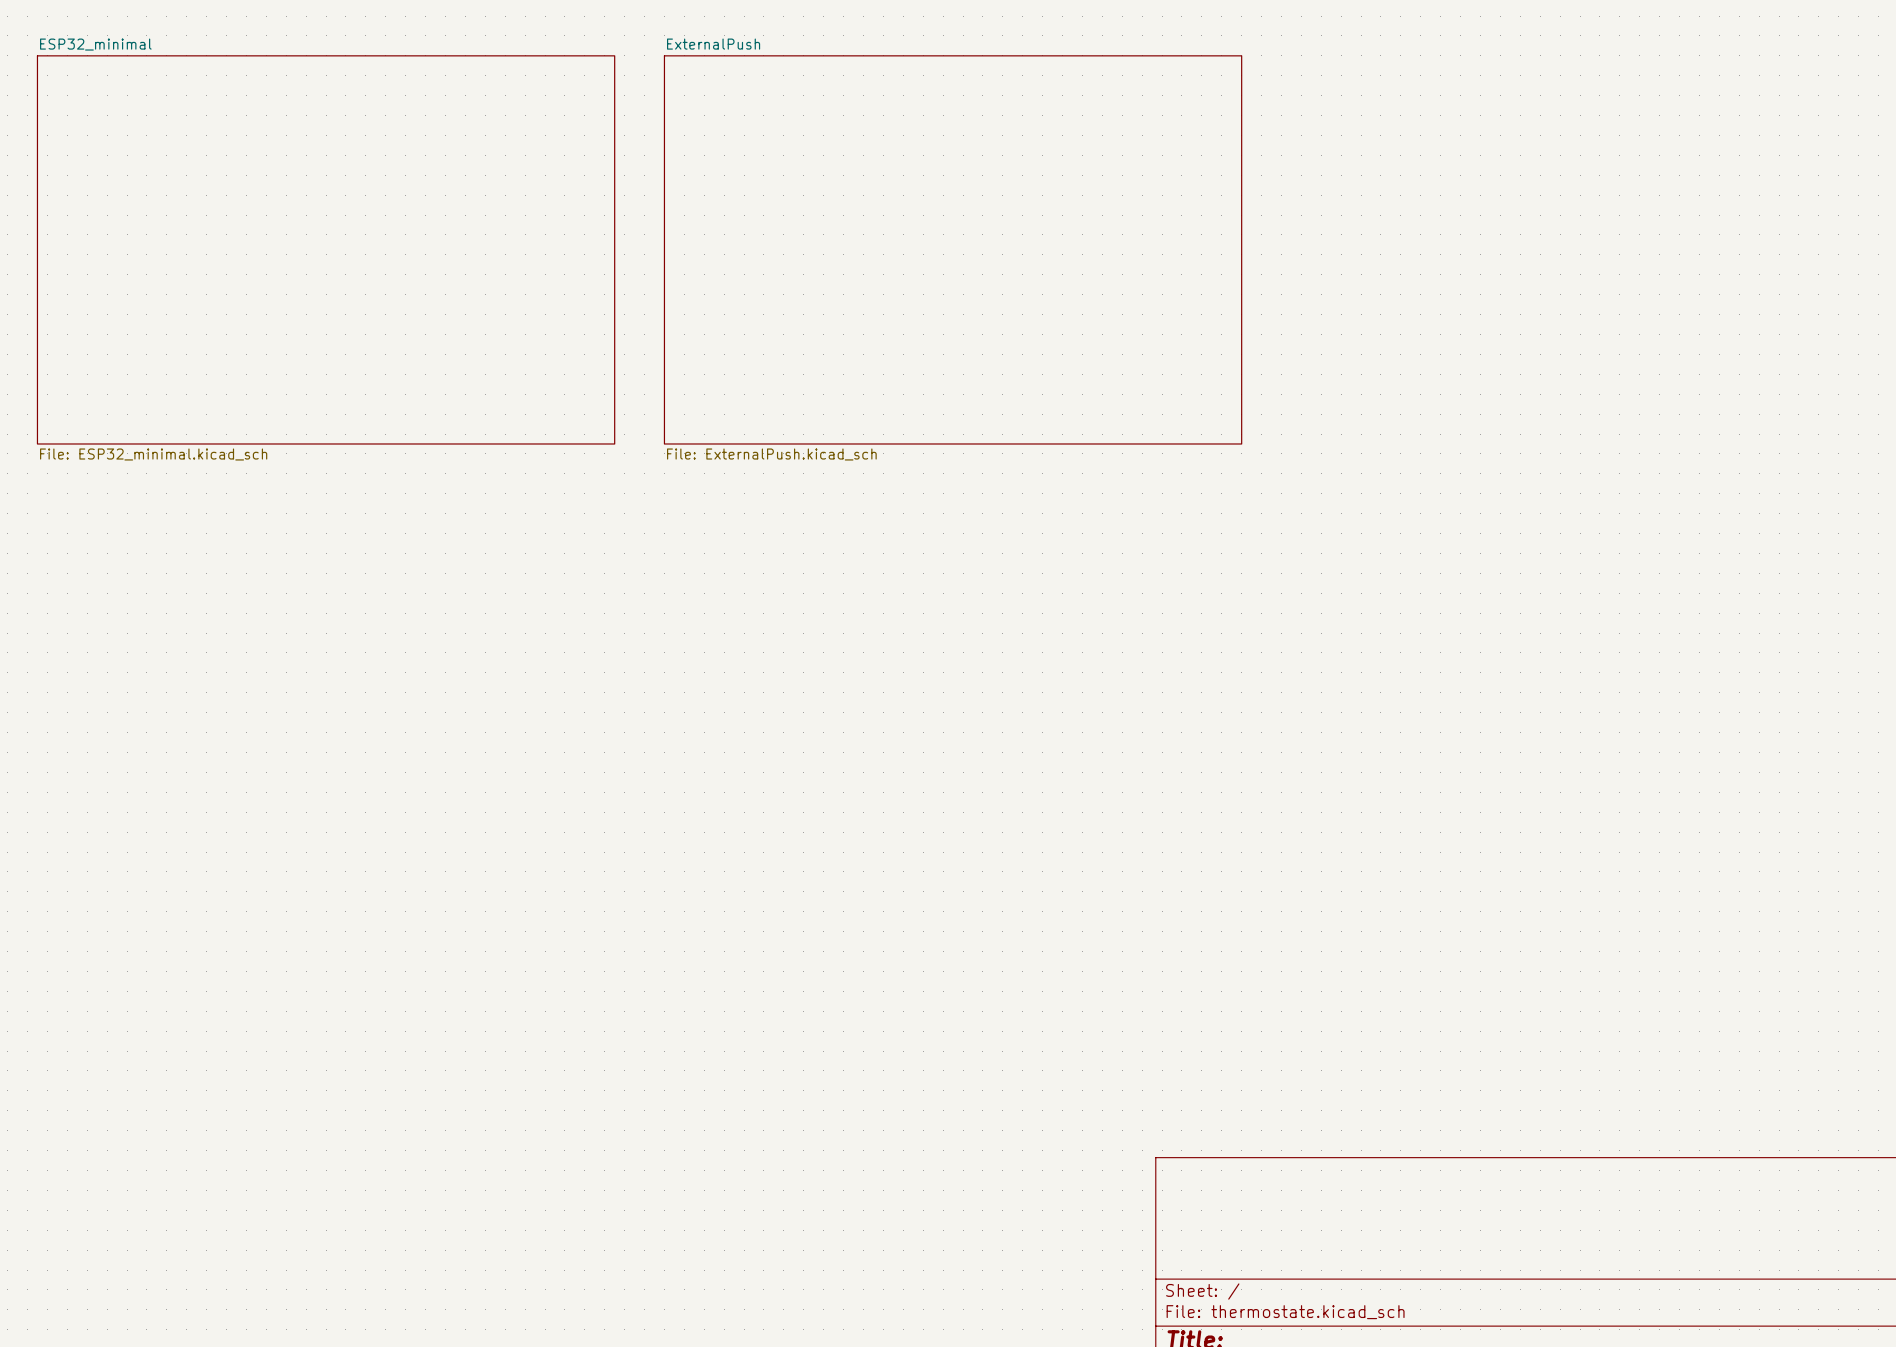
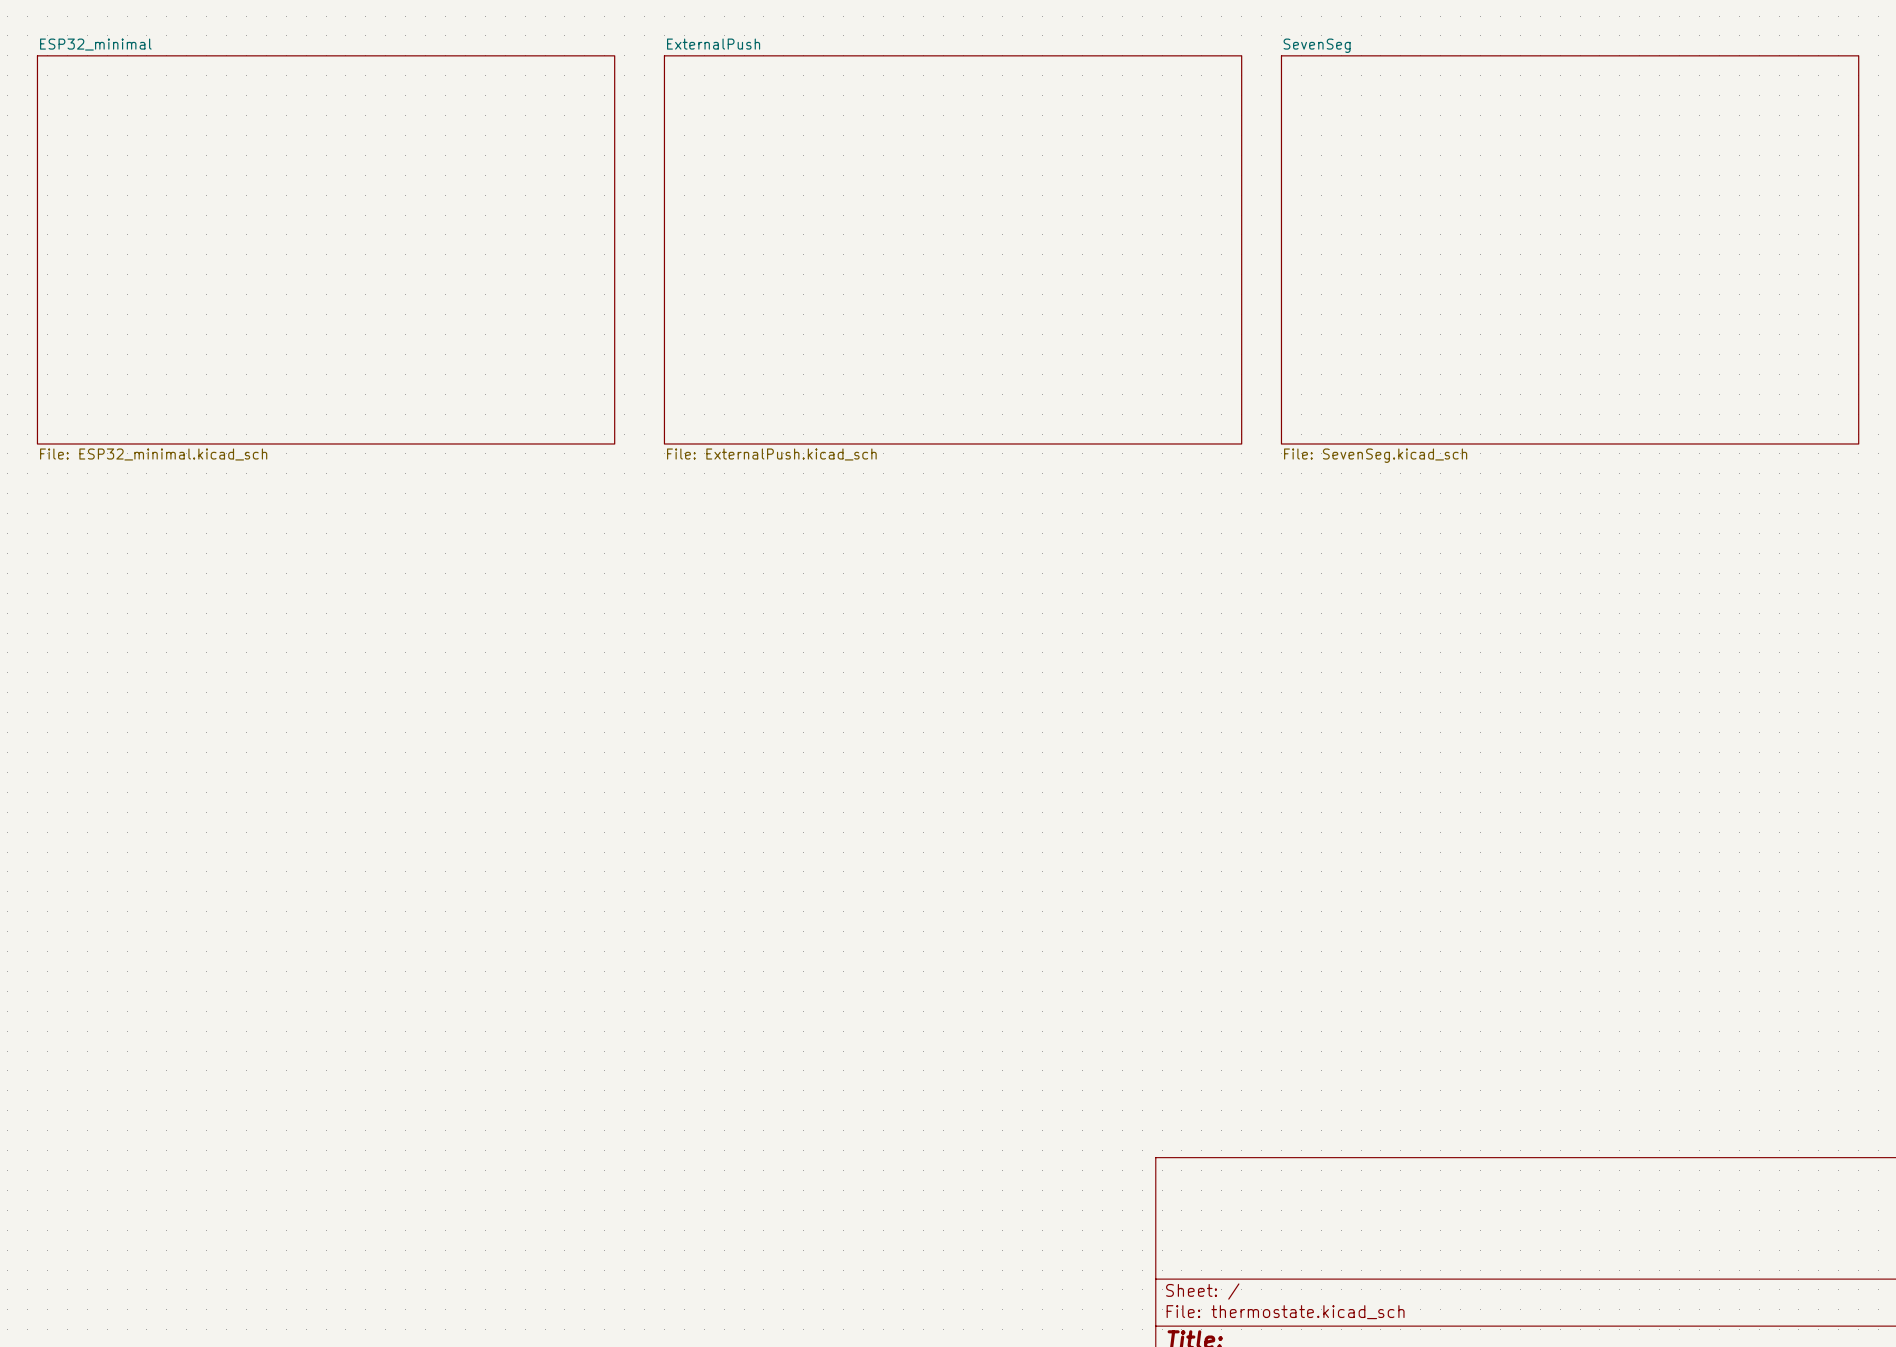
sheet SevenSeg: none -> File: SevenSeg.kicad_sch (1570, 249)

